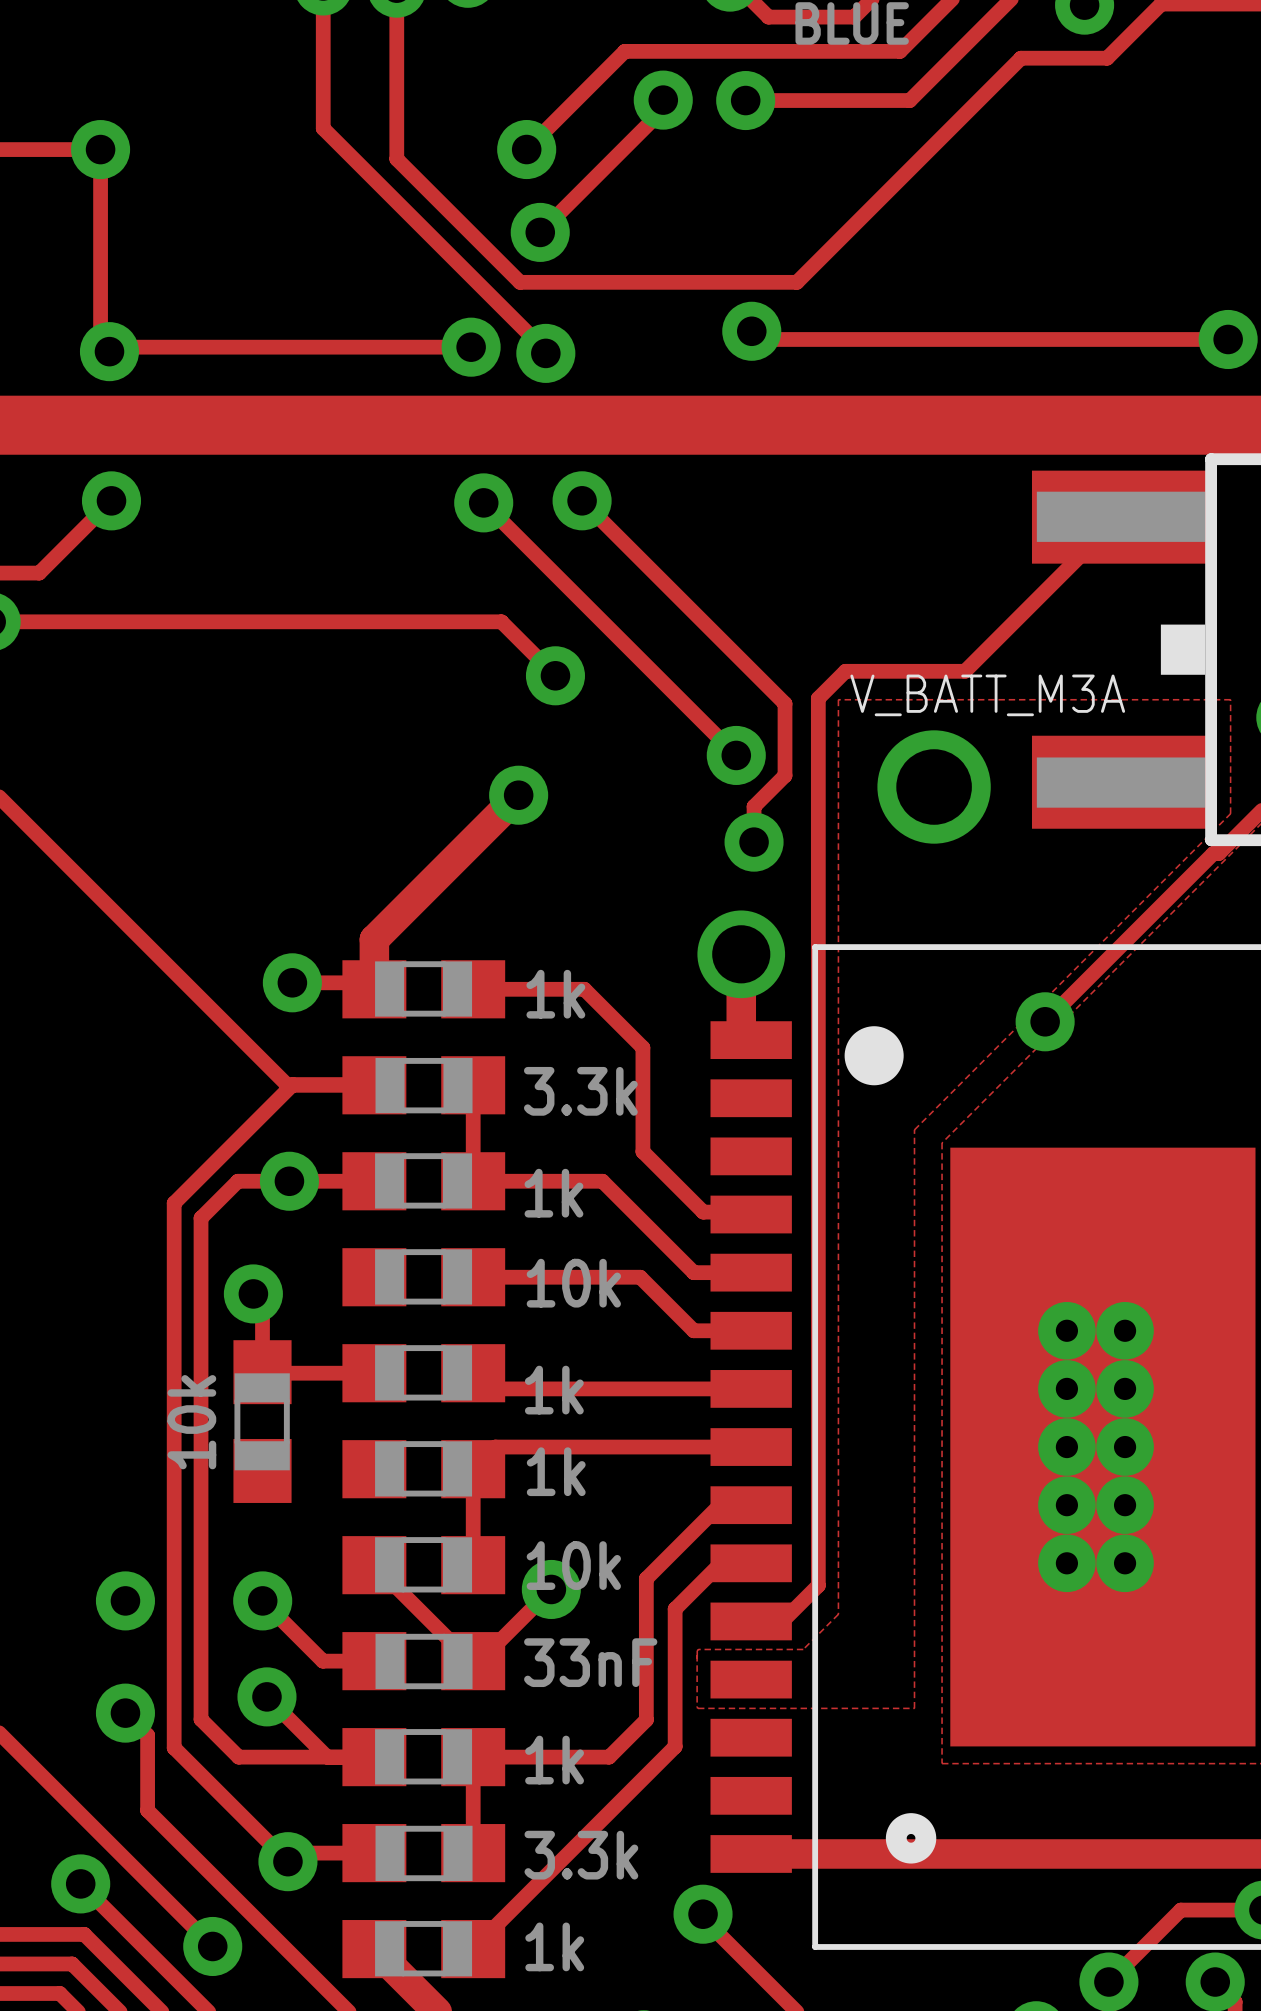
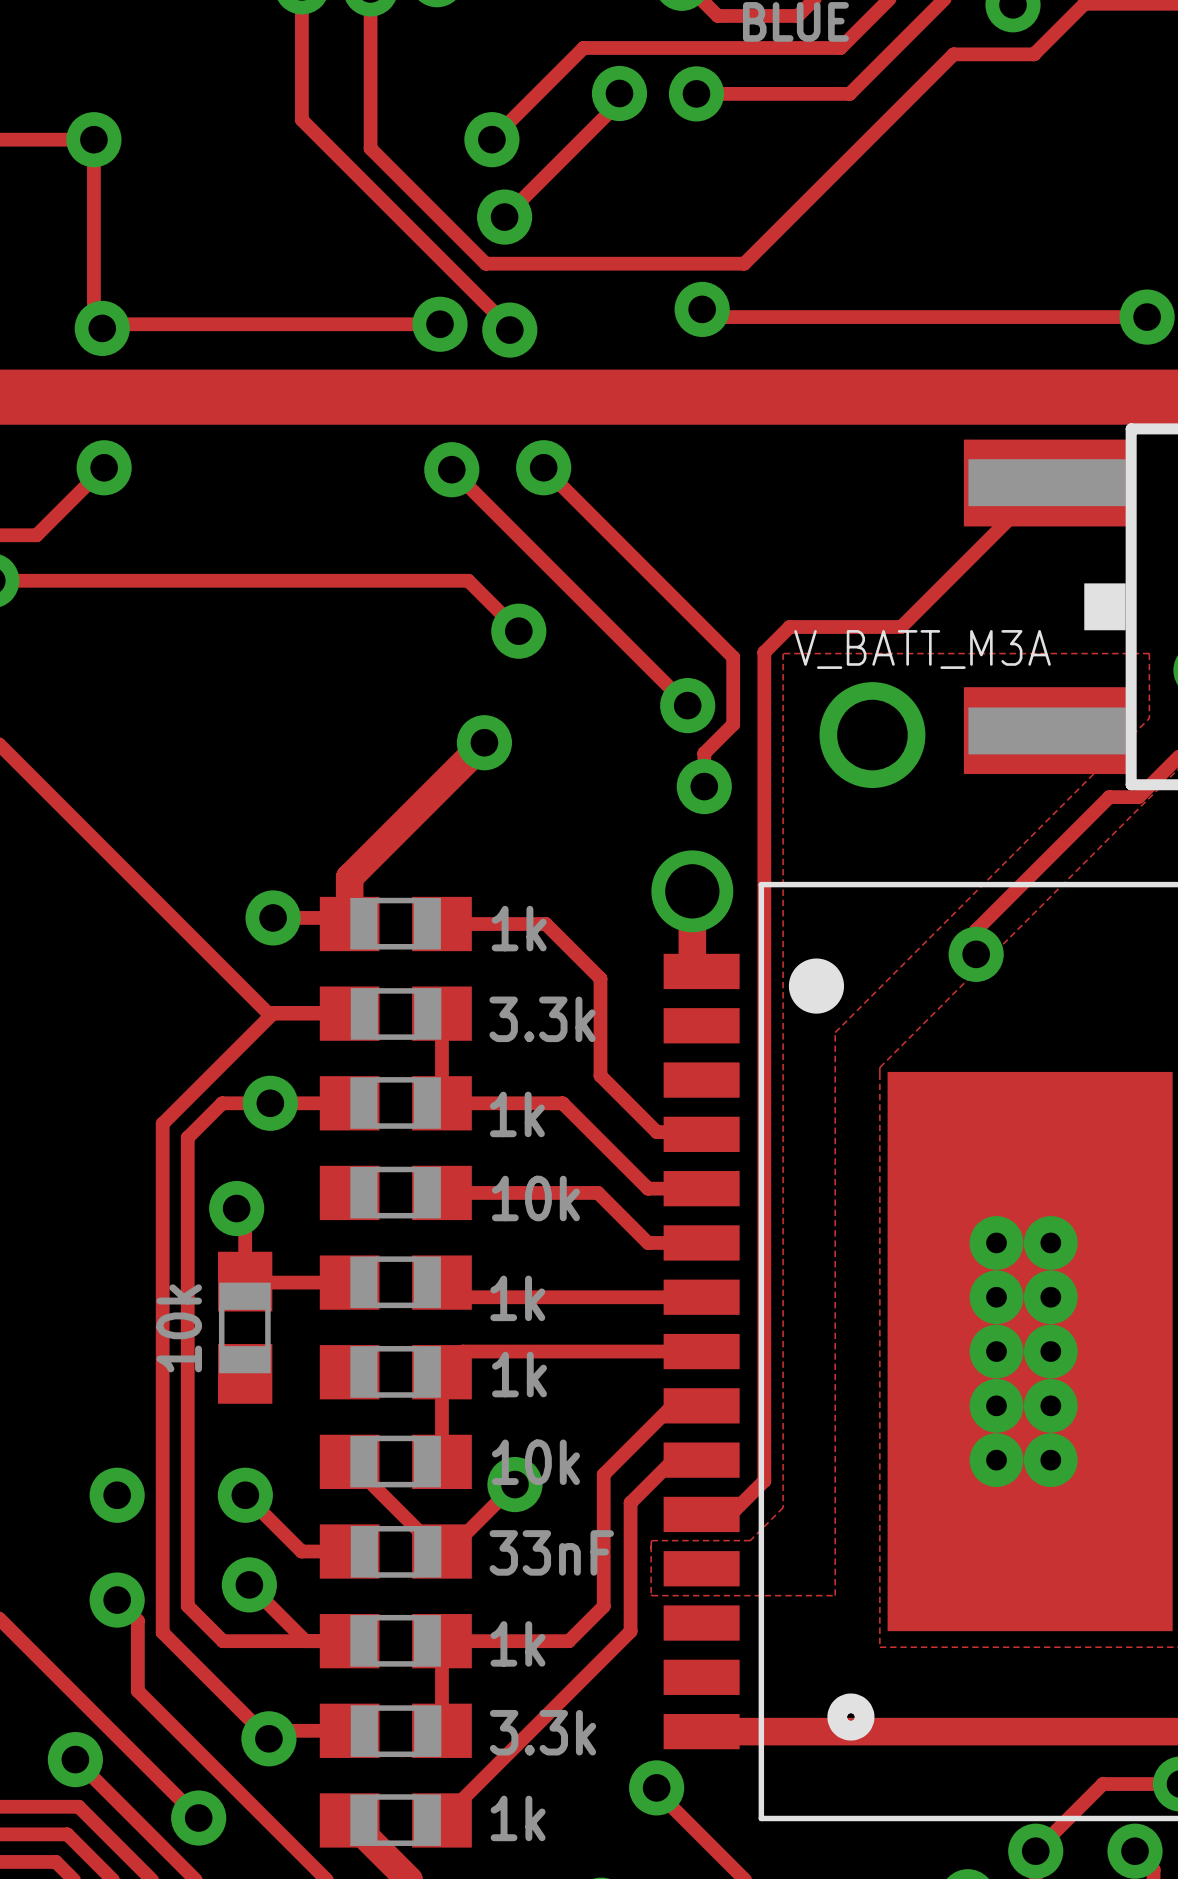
zone outline: (1230, 769) (1230, 813) (914, 1129) (914, 1708) (894, 1708) -> (1149, 718) (835, 1032) (835, 1595)
track: (1213, 853) (1045, 1021) -> (1133, 797) (1109, 797) (976, 930) (976, 954)

